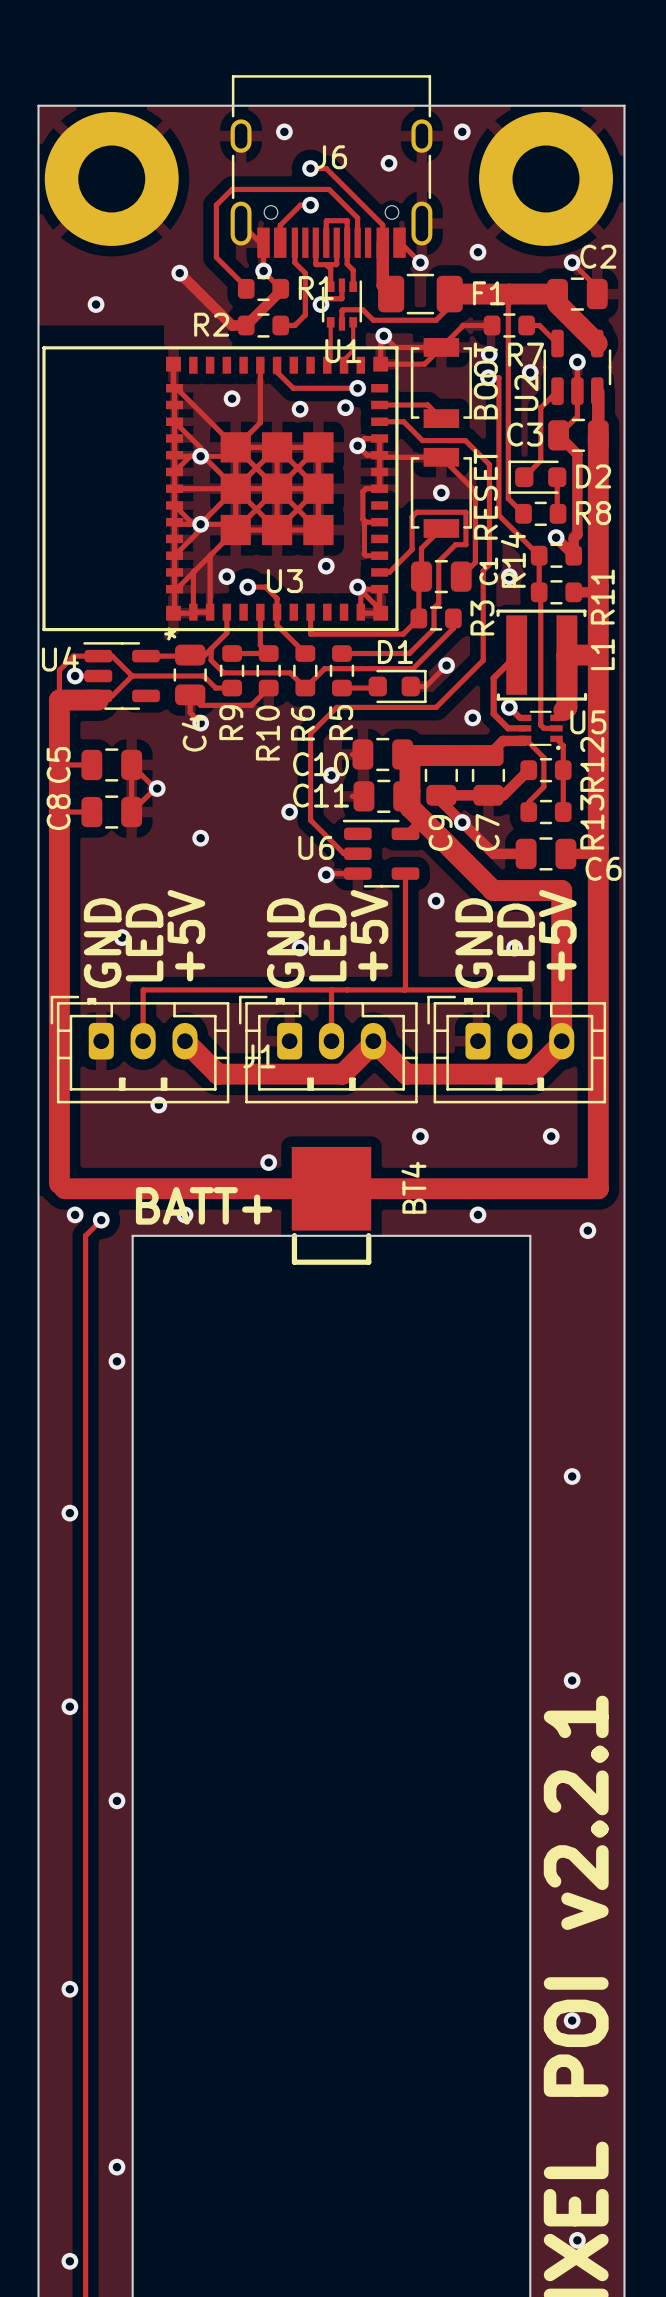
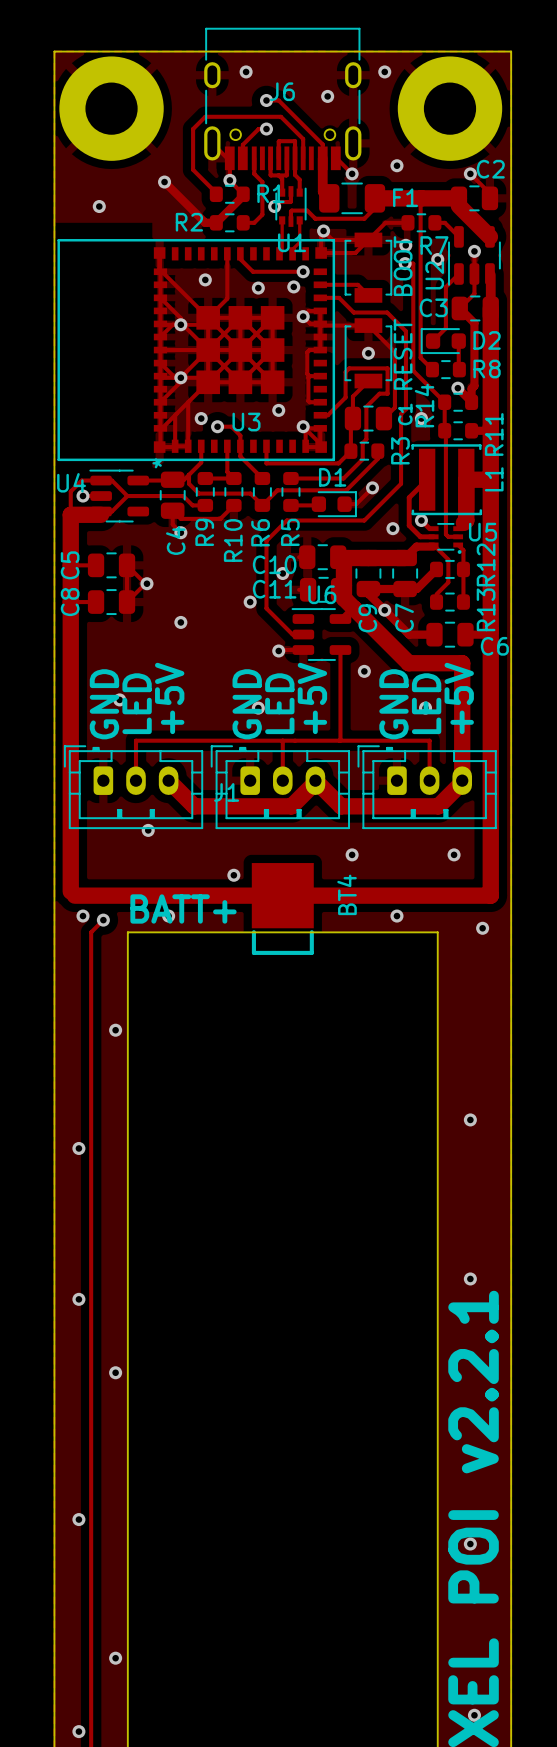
U6 name position: U6 (316, 847) -> U6 (322, 594)

